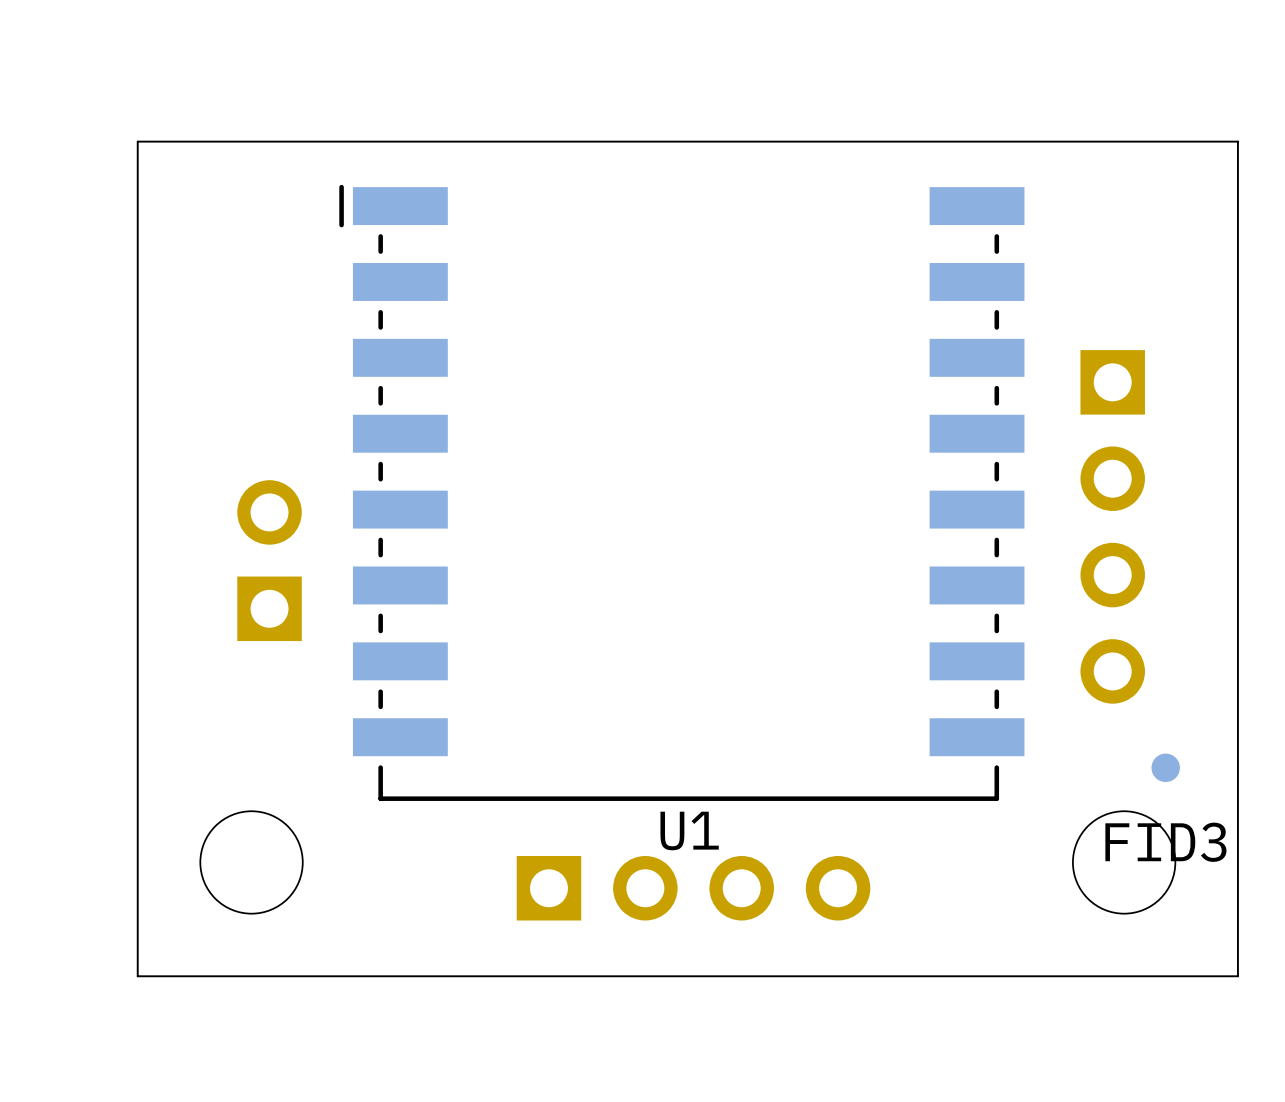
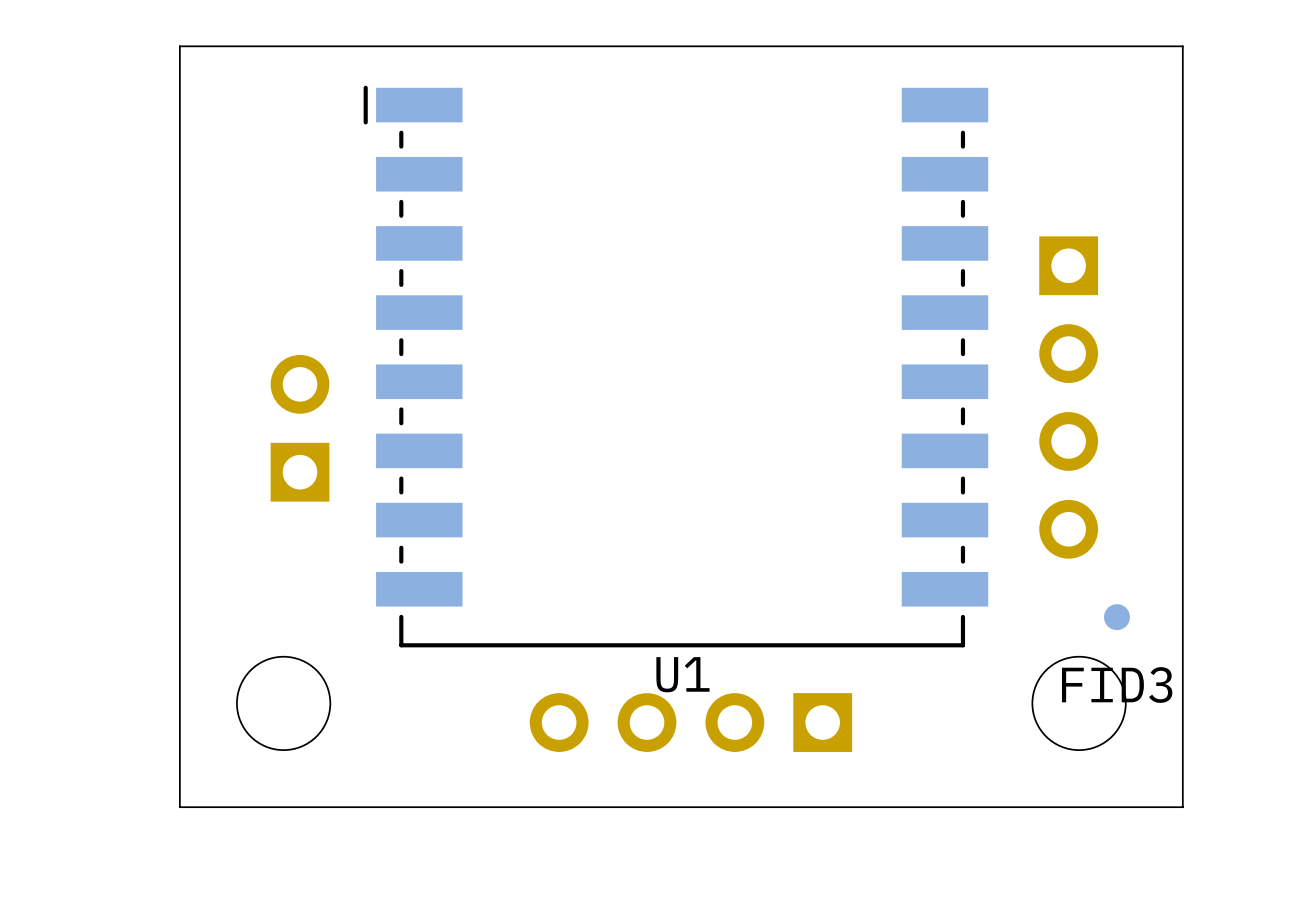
part rotation: 0° (693, 888) -> 180° (690, 722)

